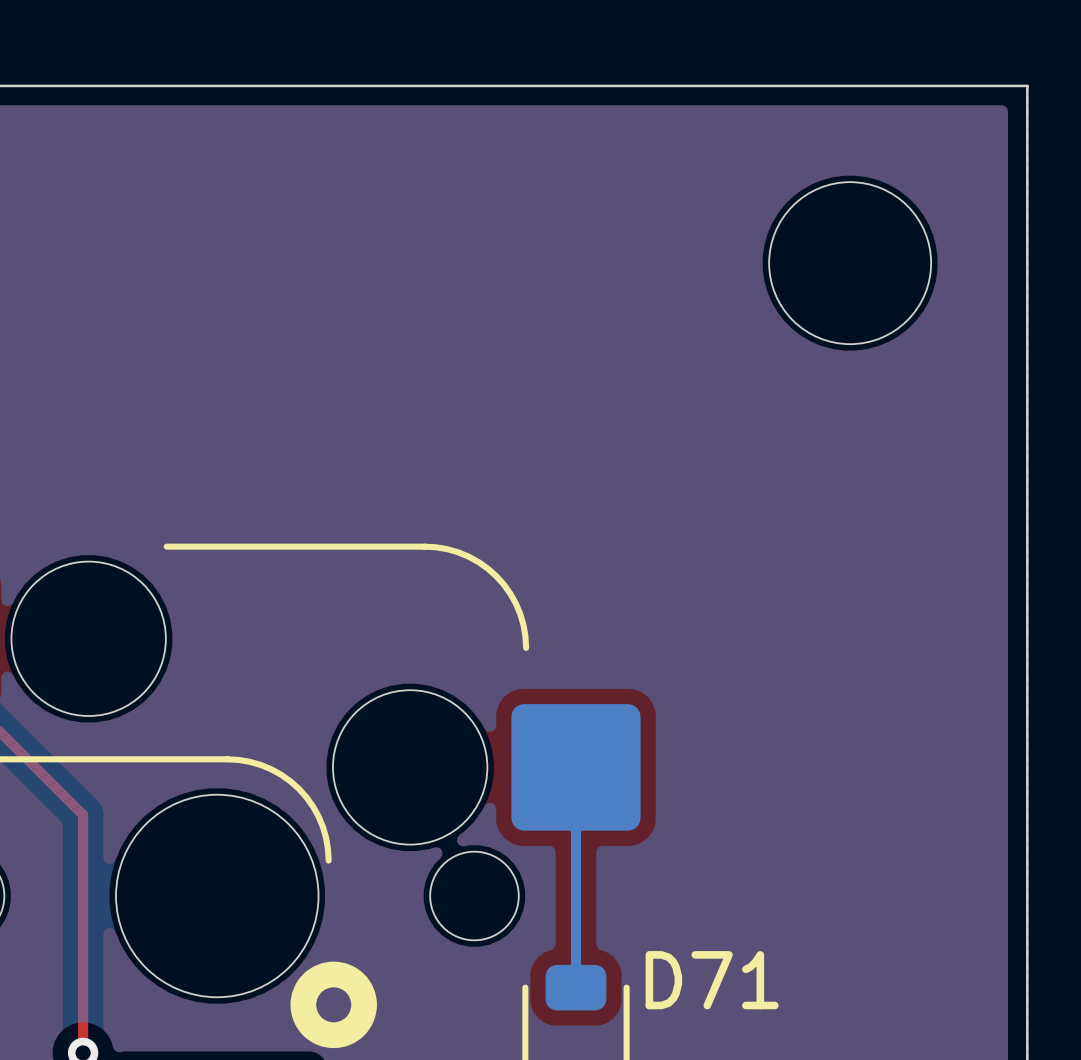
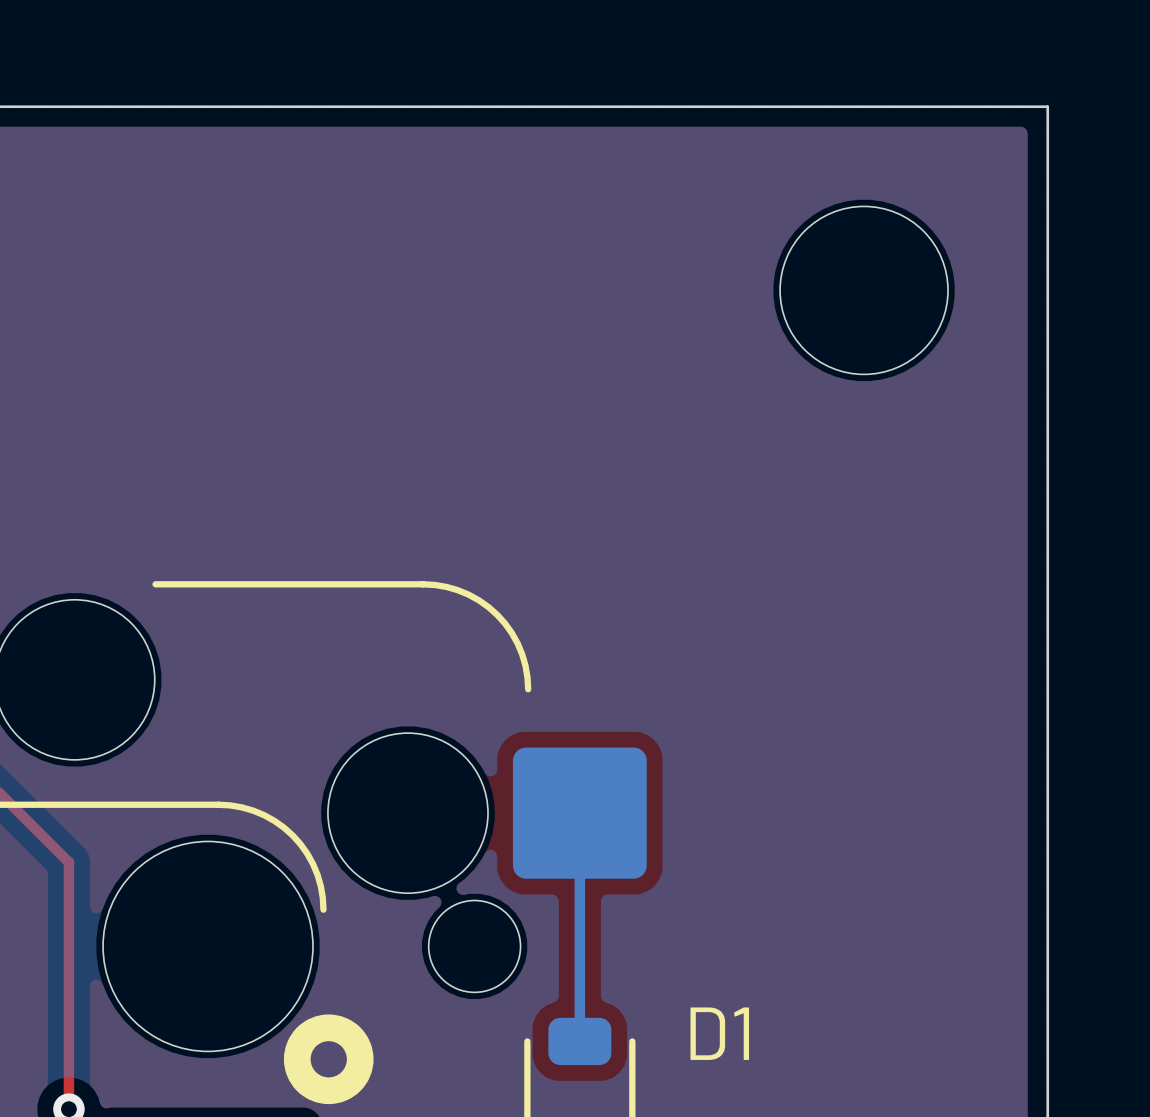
D71 name: D71 (712, 980) -> D1 (719, 1033)

